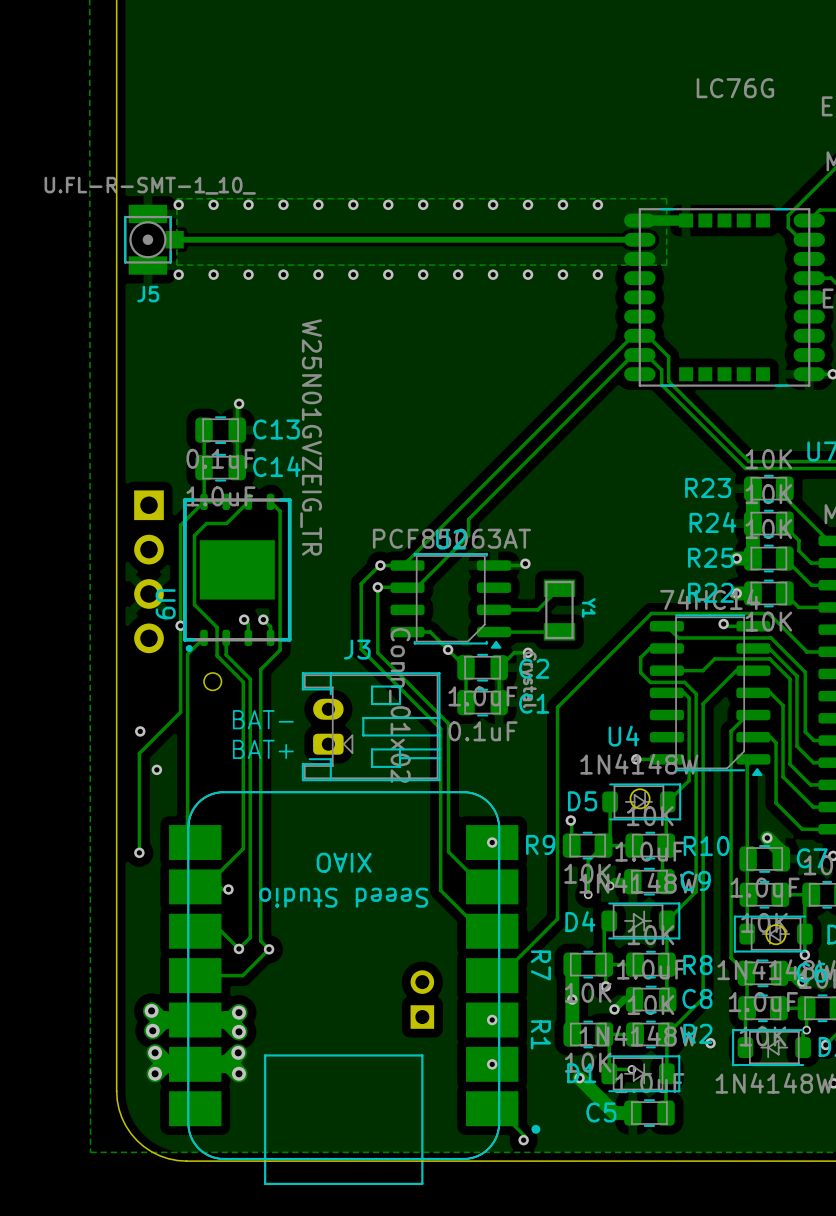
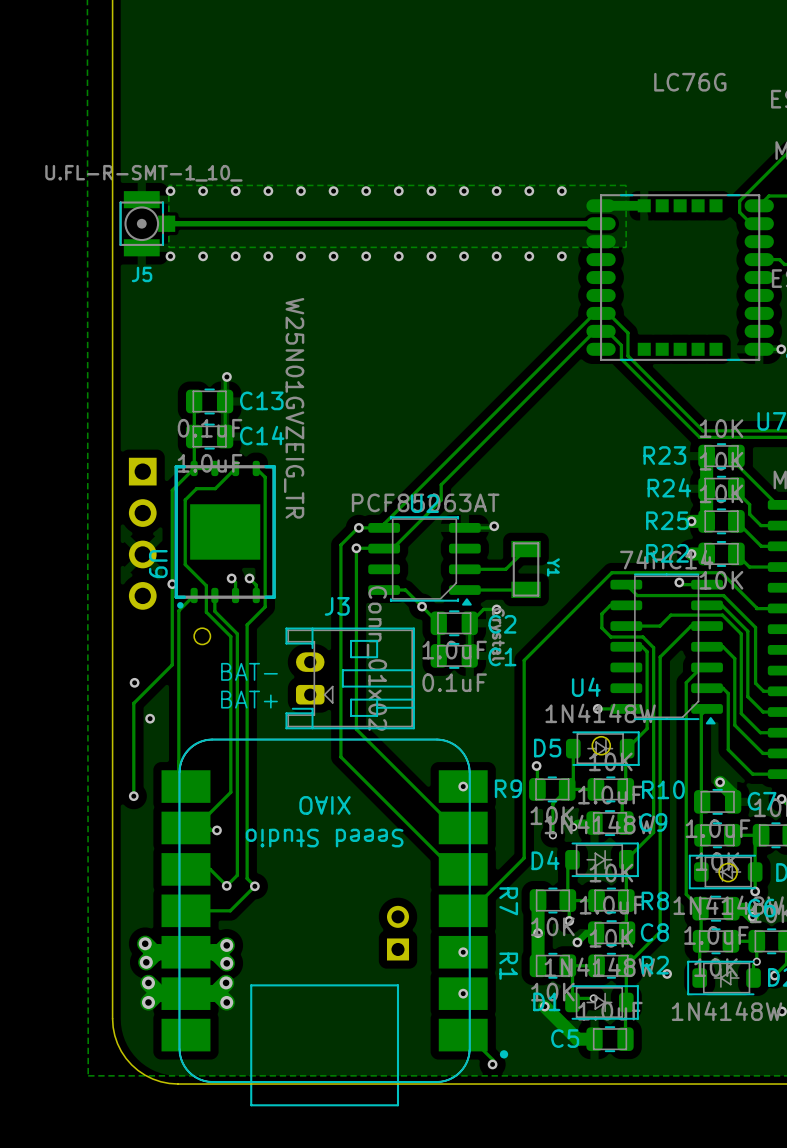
track: (361, 649) (440, 728) (440, 890) -> (340, 606) (340, 757) (415, 831)
track: (377, 652) (448, 723) (448, 851) -> (356, 609) (356, 729) (422, 795)

